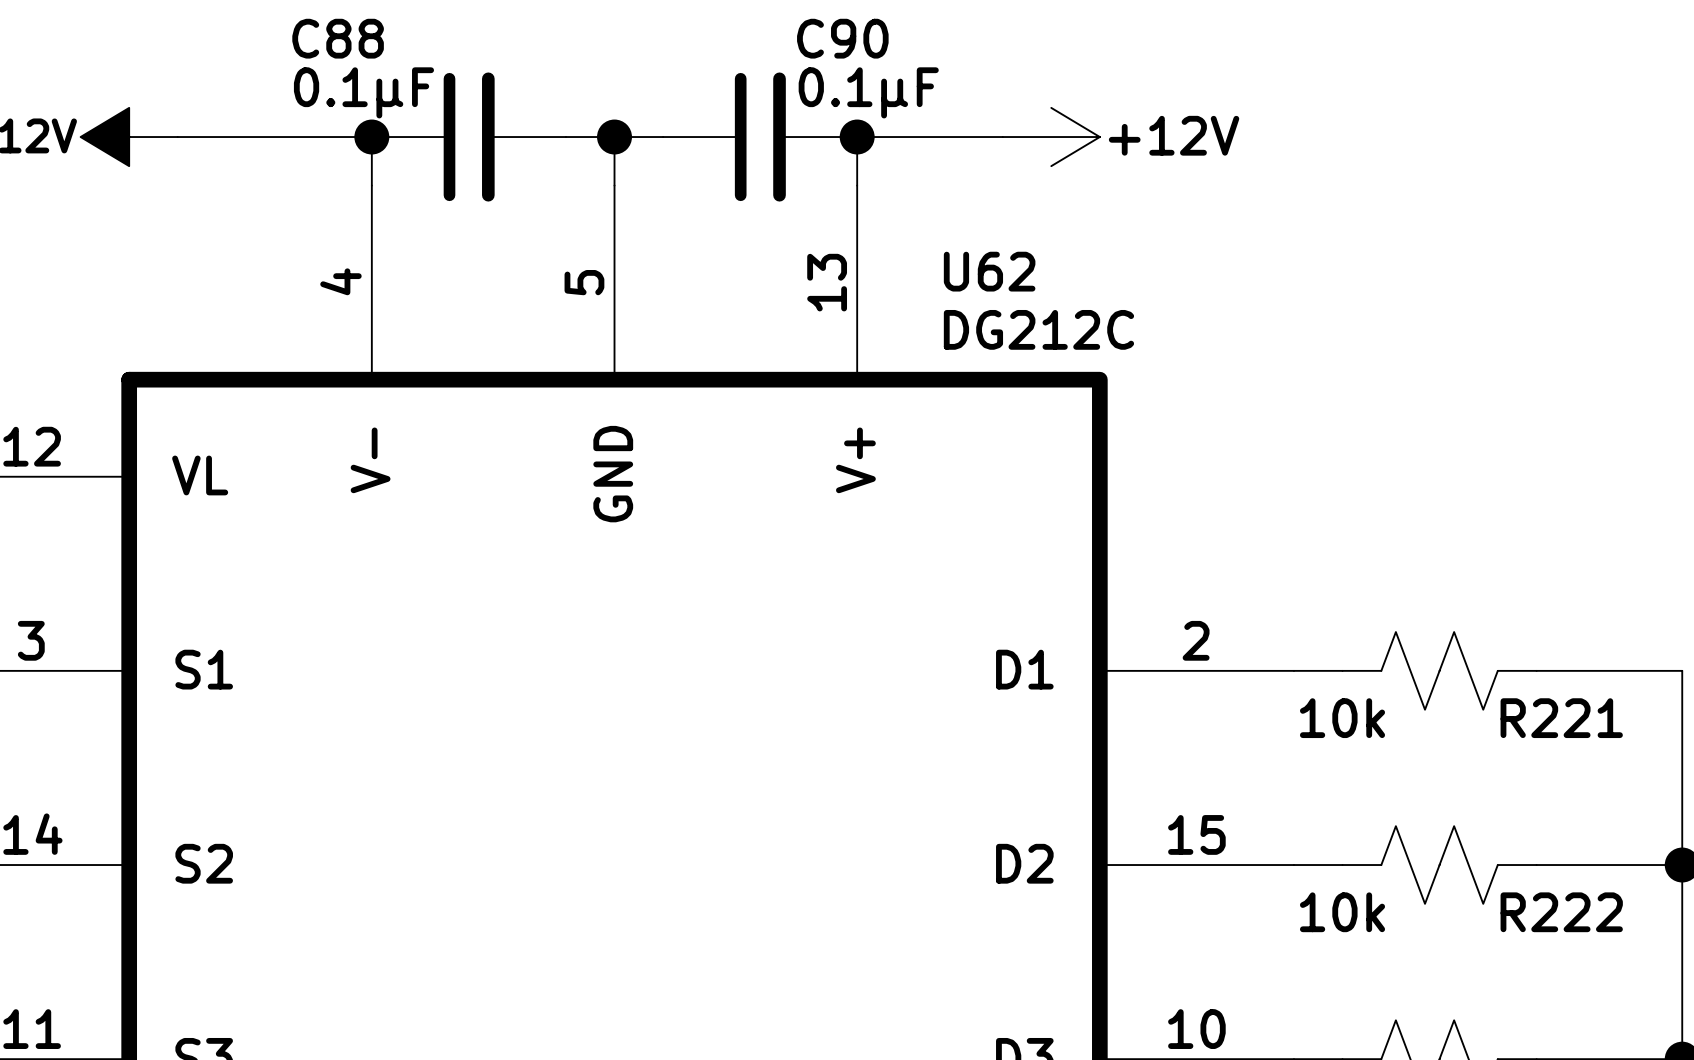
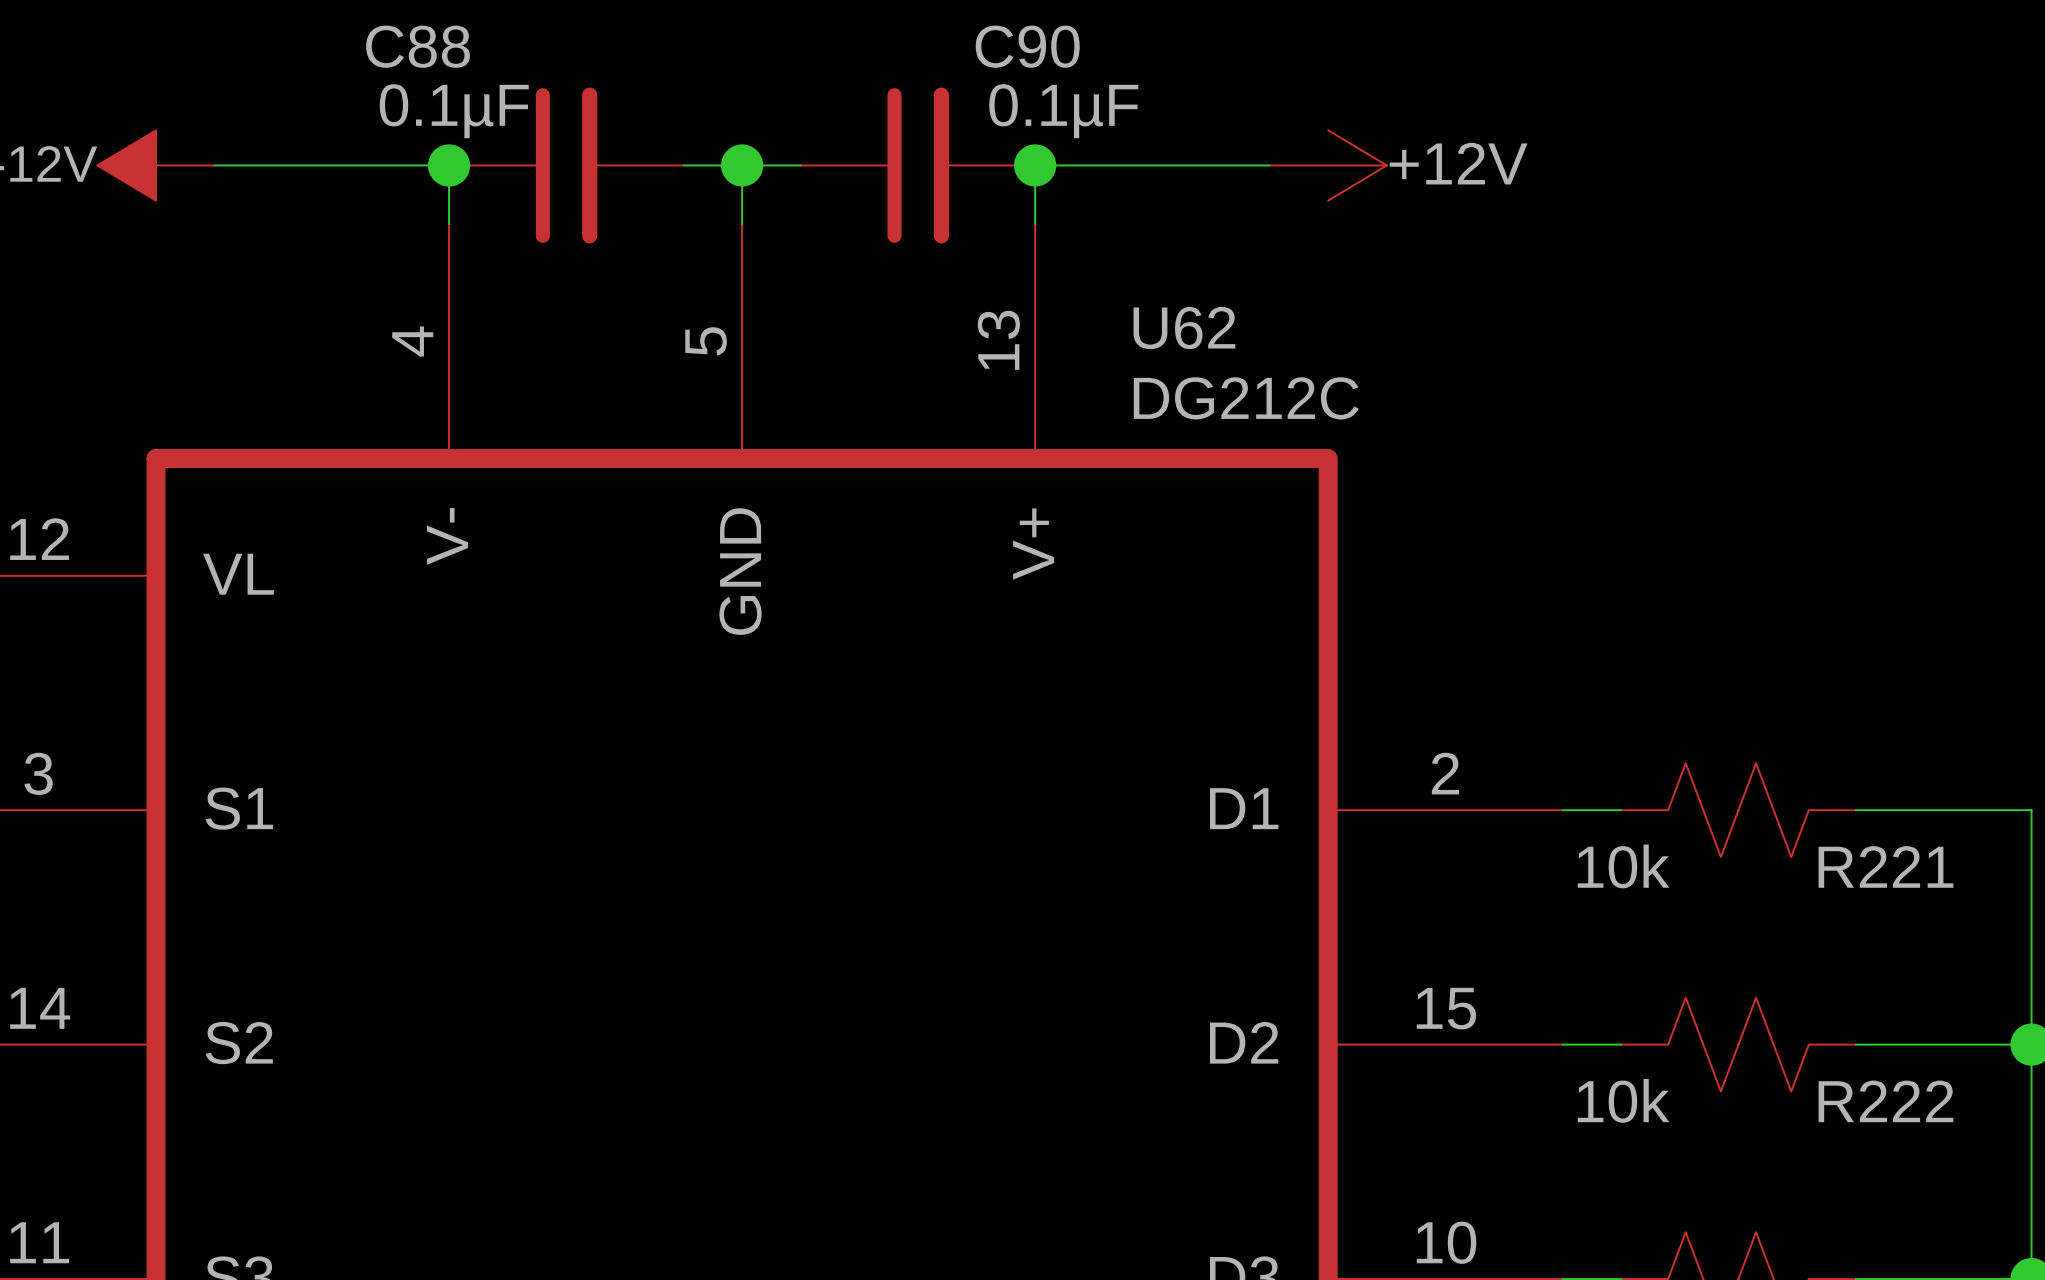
power symbol position: +12V (1051, 137) -> +12V (1328, 165)

